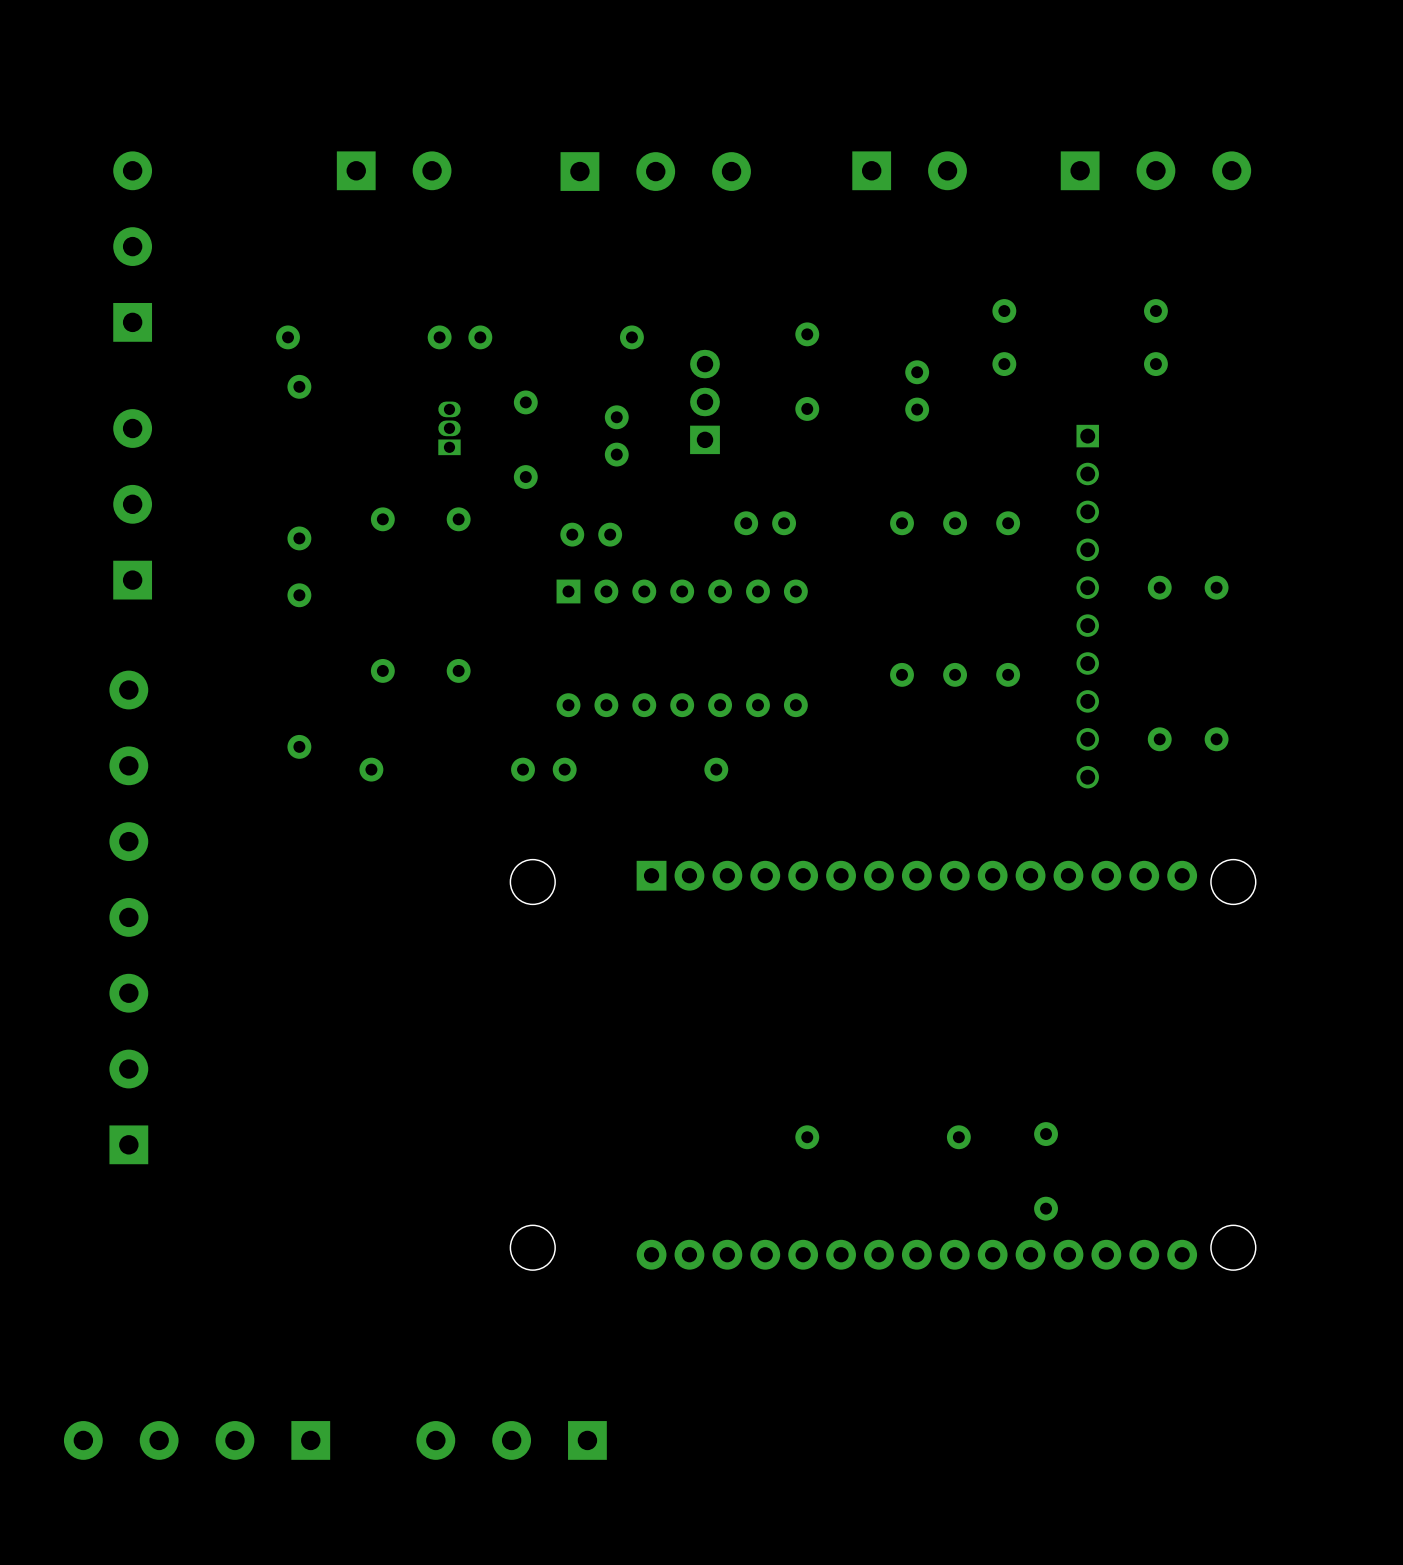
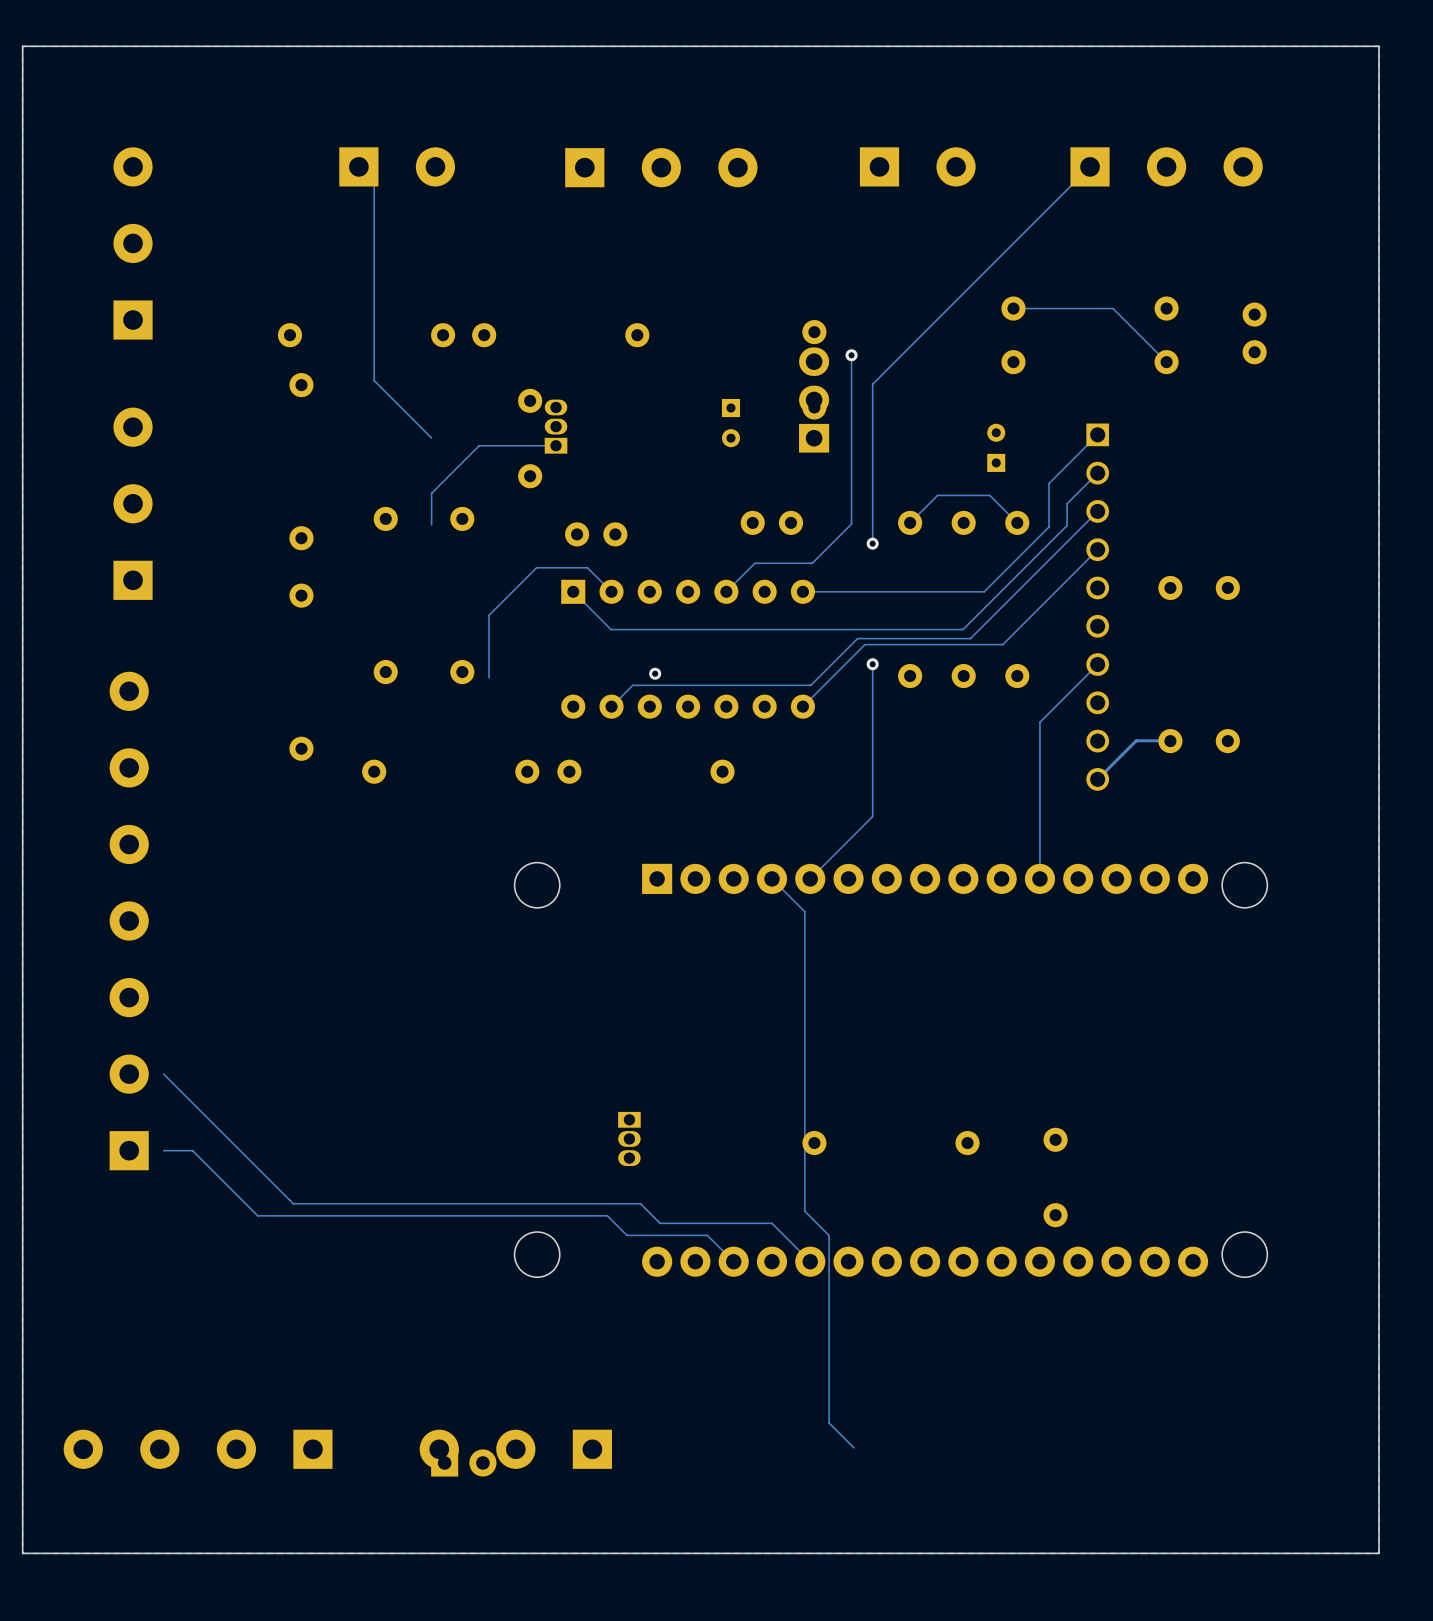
board edge: none -> (1379, 46) (22, 46) (22, 1553) (1379, 1553) (1379, 46)
track: none -> (374, 151) (374, 380) (431, 438)
track: none -> (1105, 151) (872, 384) (872, 543)
track: none -> (1013, 308) (1112, 308) (1166, 362)
part: none -> (1254, 333)
track: none -> (851, 355) (851, 524) (812, 563) (754, 563) (726, 591)
via: none -> (851, 355)
part: (917, 390) -> none
part position: (705, 401) -> (814, 399)
part: none -> (730, 423)
part position: (449, 428) -> (556, 426)
part: (616, 435) -> none
track: none -> (1097, 434) (1048, 483) (1048, 527) (984, 591) (802, 591)
track: none -> (556, 445) (479, 445) (431, 493) (431, 524)
part: none -> (996, 447)
track: none -> (1097, 473) (1067, 503) (1067, 525) (963, 629) (611, 629) (573, 591)
track: none -> (1097, 511) (970, 638) (857, 638) (810, 685) (632, 685) (611, 706)
track: none -> (1017, 522) (989, 495) (937, 495) (910, 522)
via: none -> (872, 543)
track: none -> (1097, 549) (1002, 644) (864, 644) (802, 706)
track: none -> (611, 591) (587, 567) (536, 567) (489, 615) (489, 677)
track: none -> (872, 664) (872, 816) (810, 878)
via: none -> (872, 664)
track: none -> (1097, 664) (1039, 722) (1039, 878)
via: none -> (655, 673)
track: none -> (1168, 740) (1136, 740) (1097, 779)
track: none -> (771, 878) (804, 911) (804, 1211) (829, 1235) (829, 1423) (853, 1447)
track: none -> (163, 1074) (293, 1203) (640, 1203) (660, 1223) (771, 1223) (810, 1261)
part: none -> (629, 1138)
track: none -> (163, 1150) (192, 1150) (257, 1215) (607, 1215) (627, 1235) (707, 1235) (733, 1261)
part: none -> (463, 1462)

